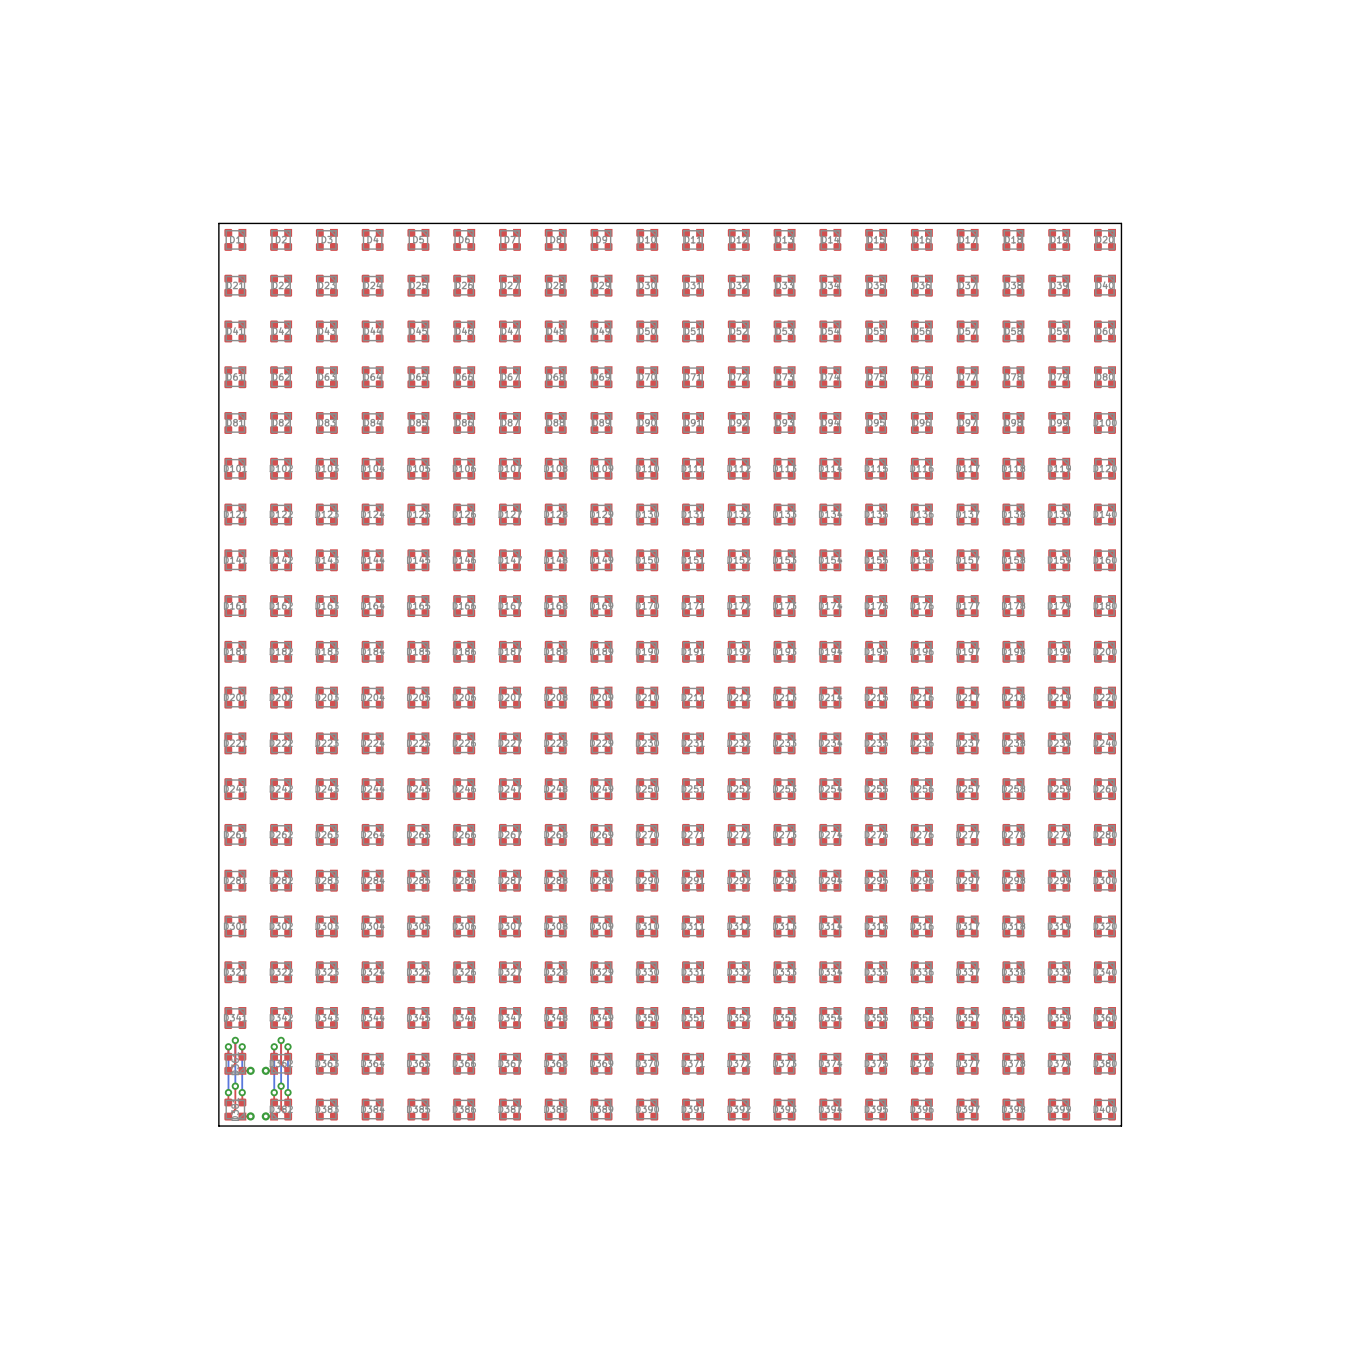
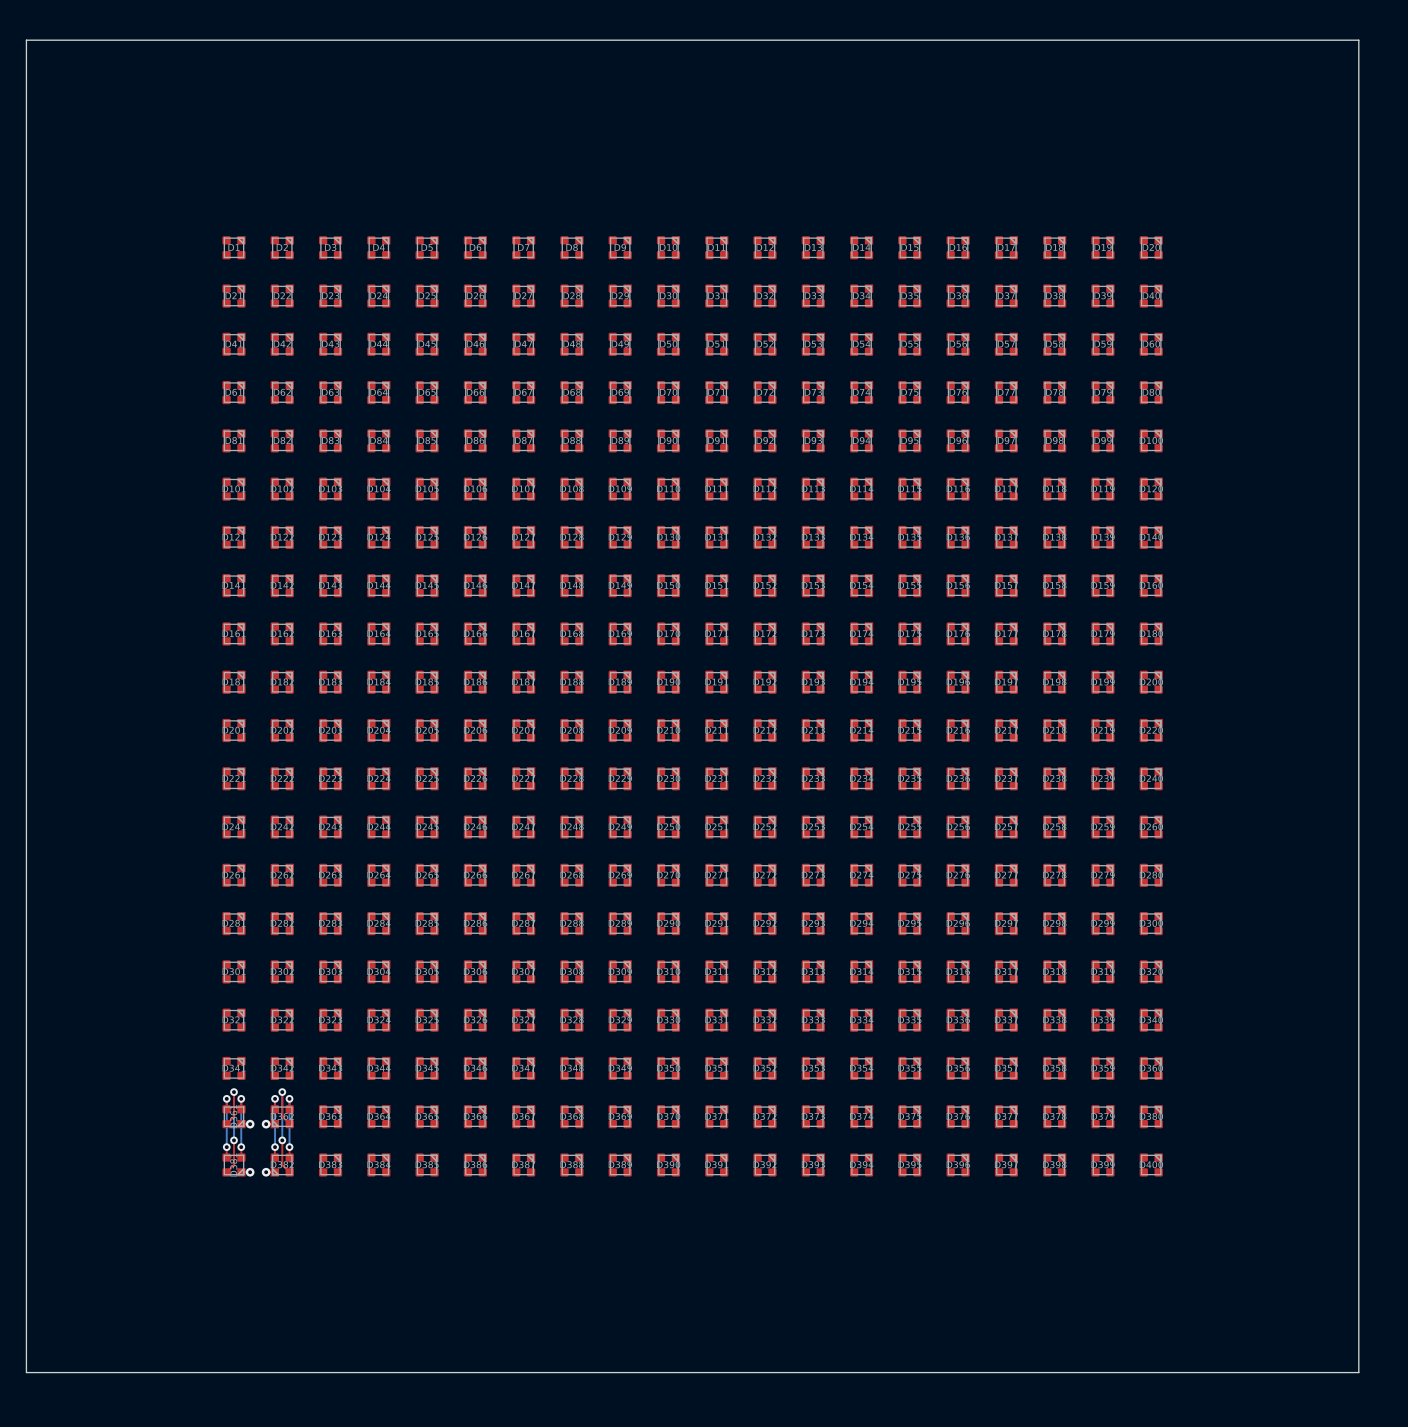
board edge: (218, 223) (1121, 223) (1121, 1126) (218, 1126) (218, 223) -> (26, 40) (26, 1372) (1358, 1372) (1358, 40) (26, 40)

